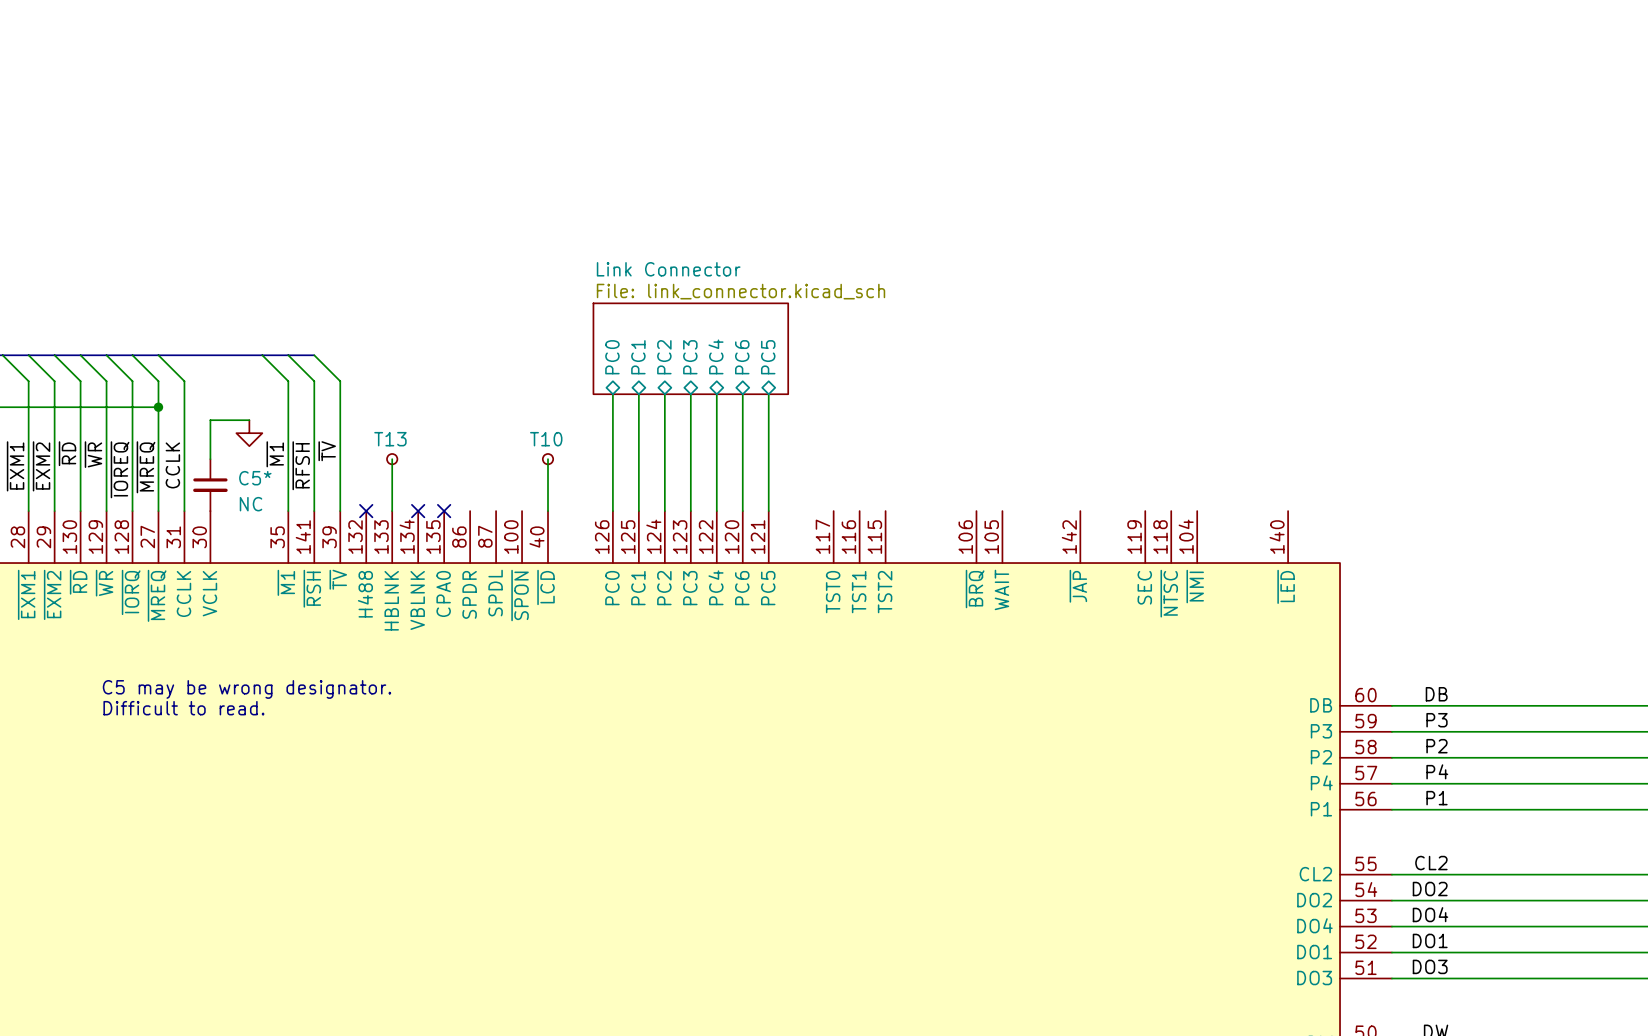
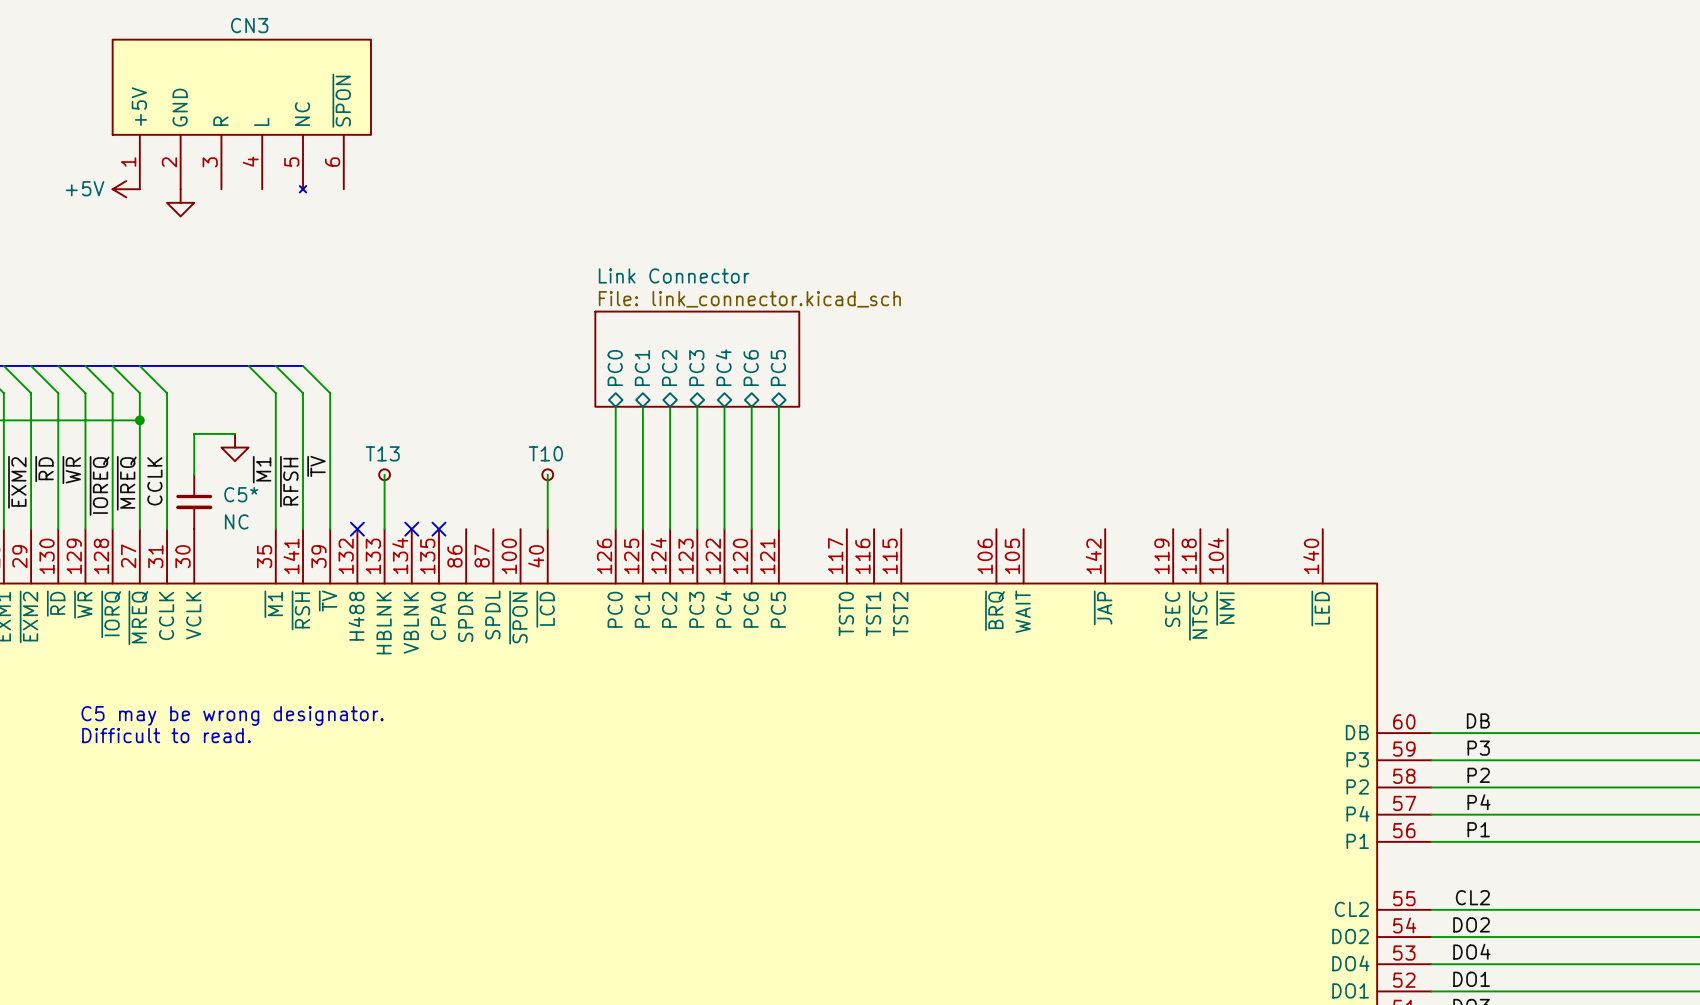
CN3: none -> (241, 116)
power symbol: none -> +5V (126, 189)
power symbol: none -> (180, 202)

